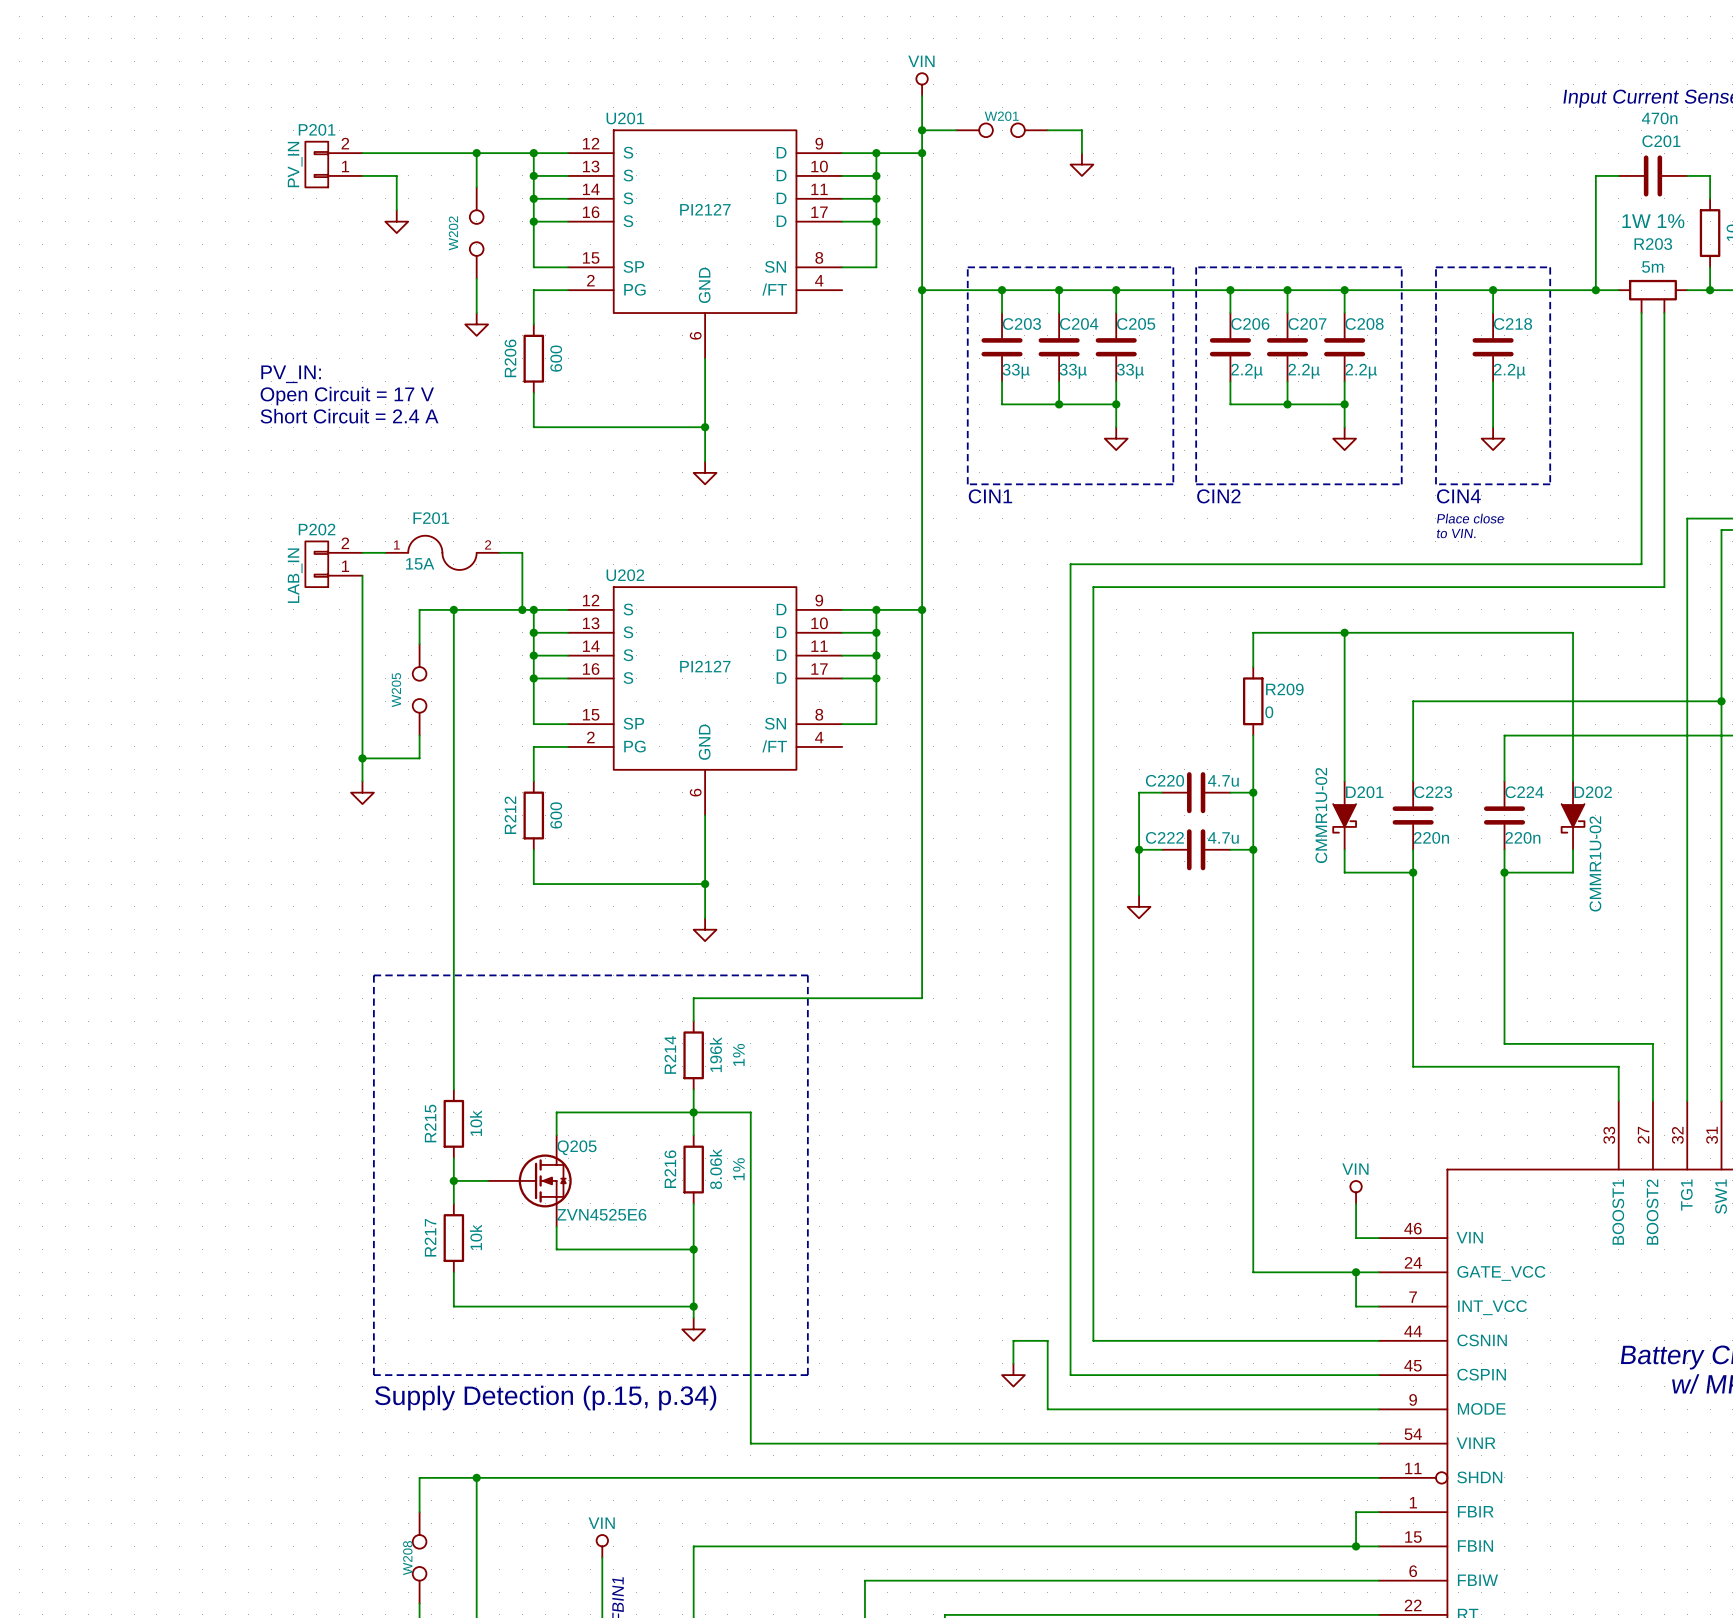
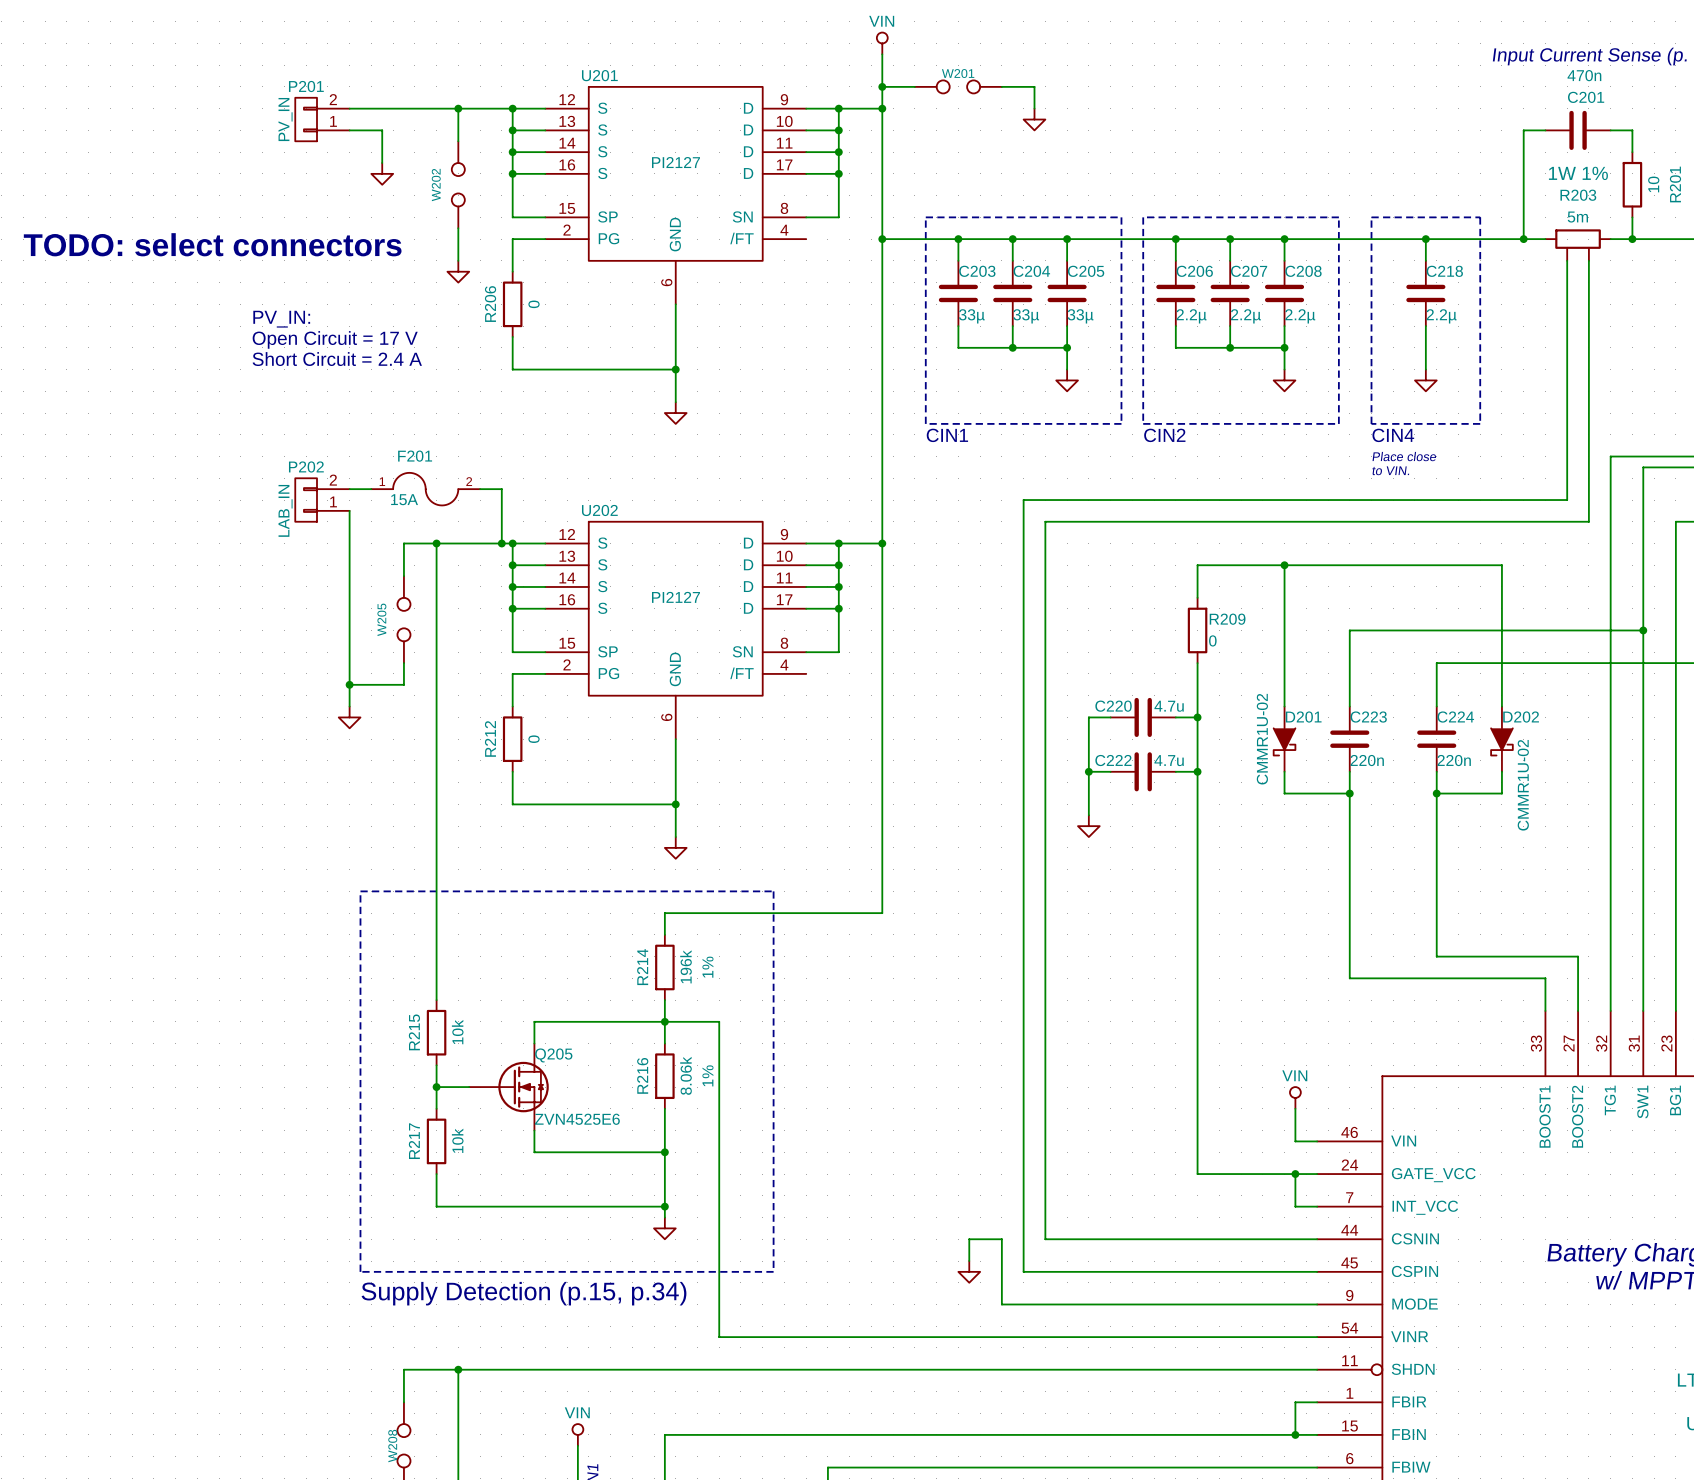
text: none -> TODO: select connectors (212, 244)
R206 value: 600 (556, 358) -> 0 (534, 304)
R212 value: 600 (556, 815) -> 0 (534, 739)

